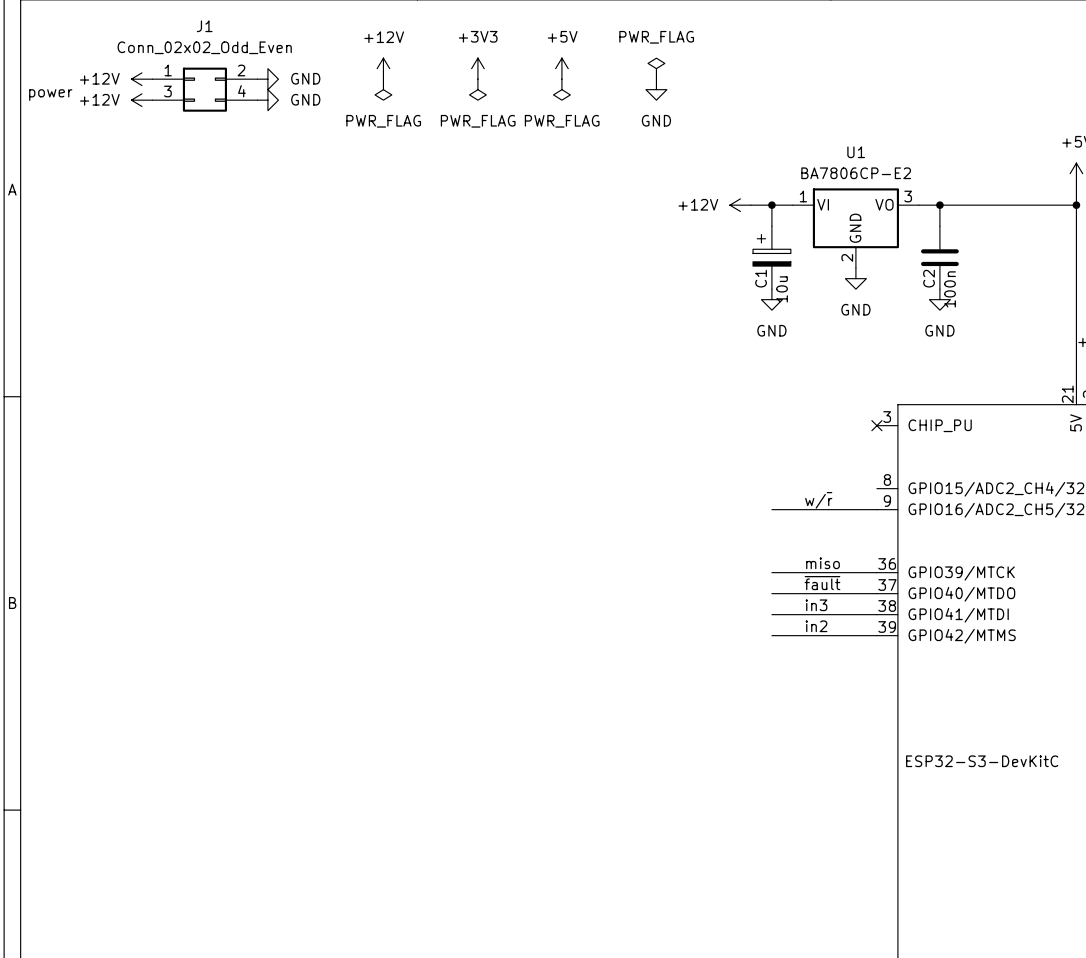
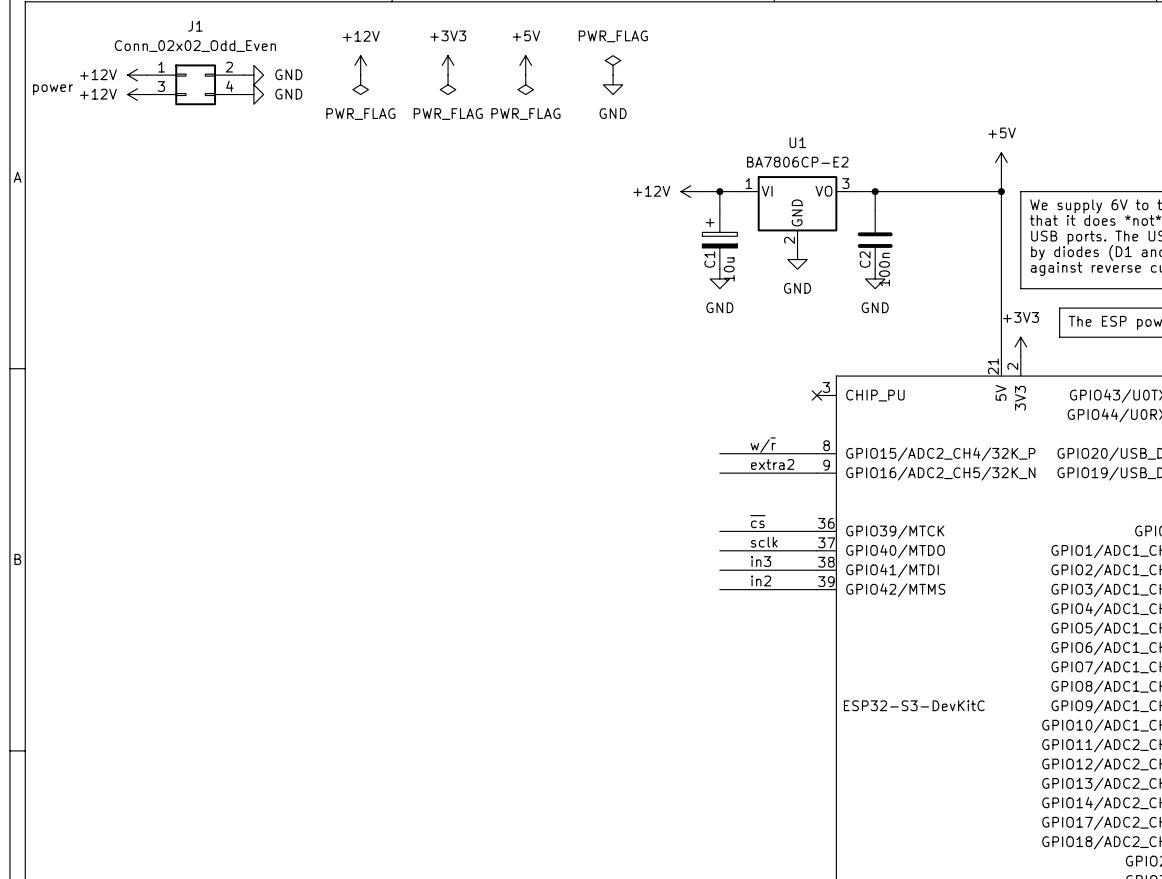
label: none -> w/~{r} (763, 445)
wire: none -> (719, 453) (816, 453)
label: w/~{r} (818, 500) -> extra2 (772, 464)
label: miso (823, 563) -> ~{cs} (757, 521)
label: ~{fault} (822, 583) -> sclk (764, 542)

